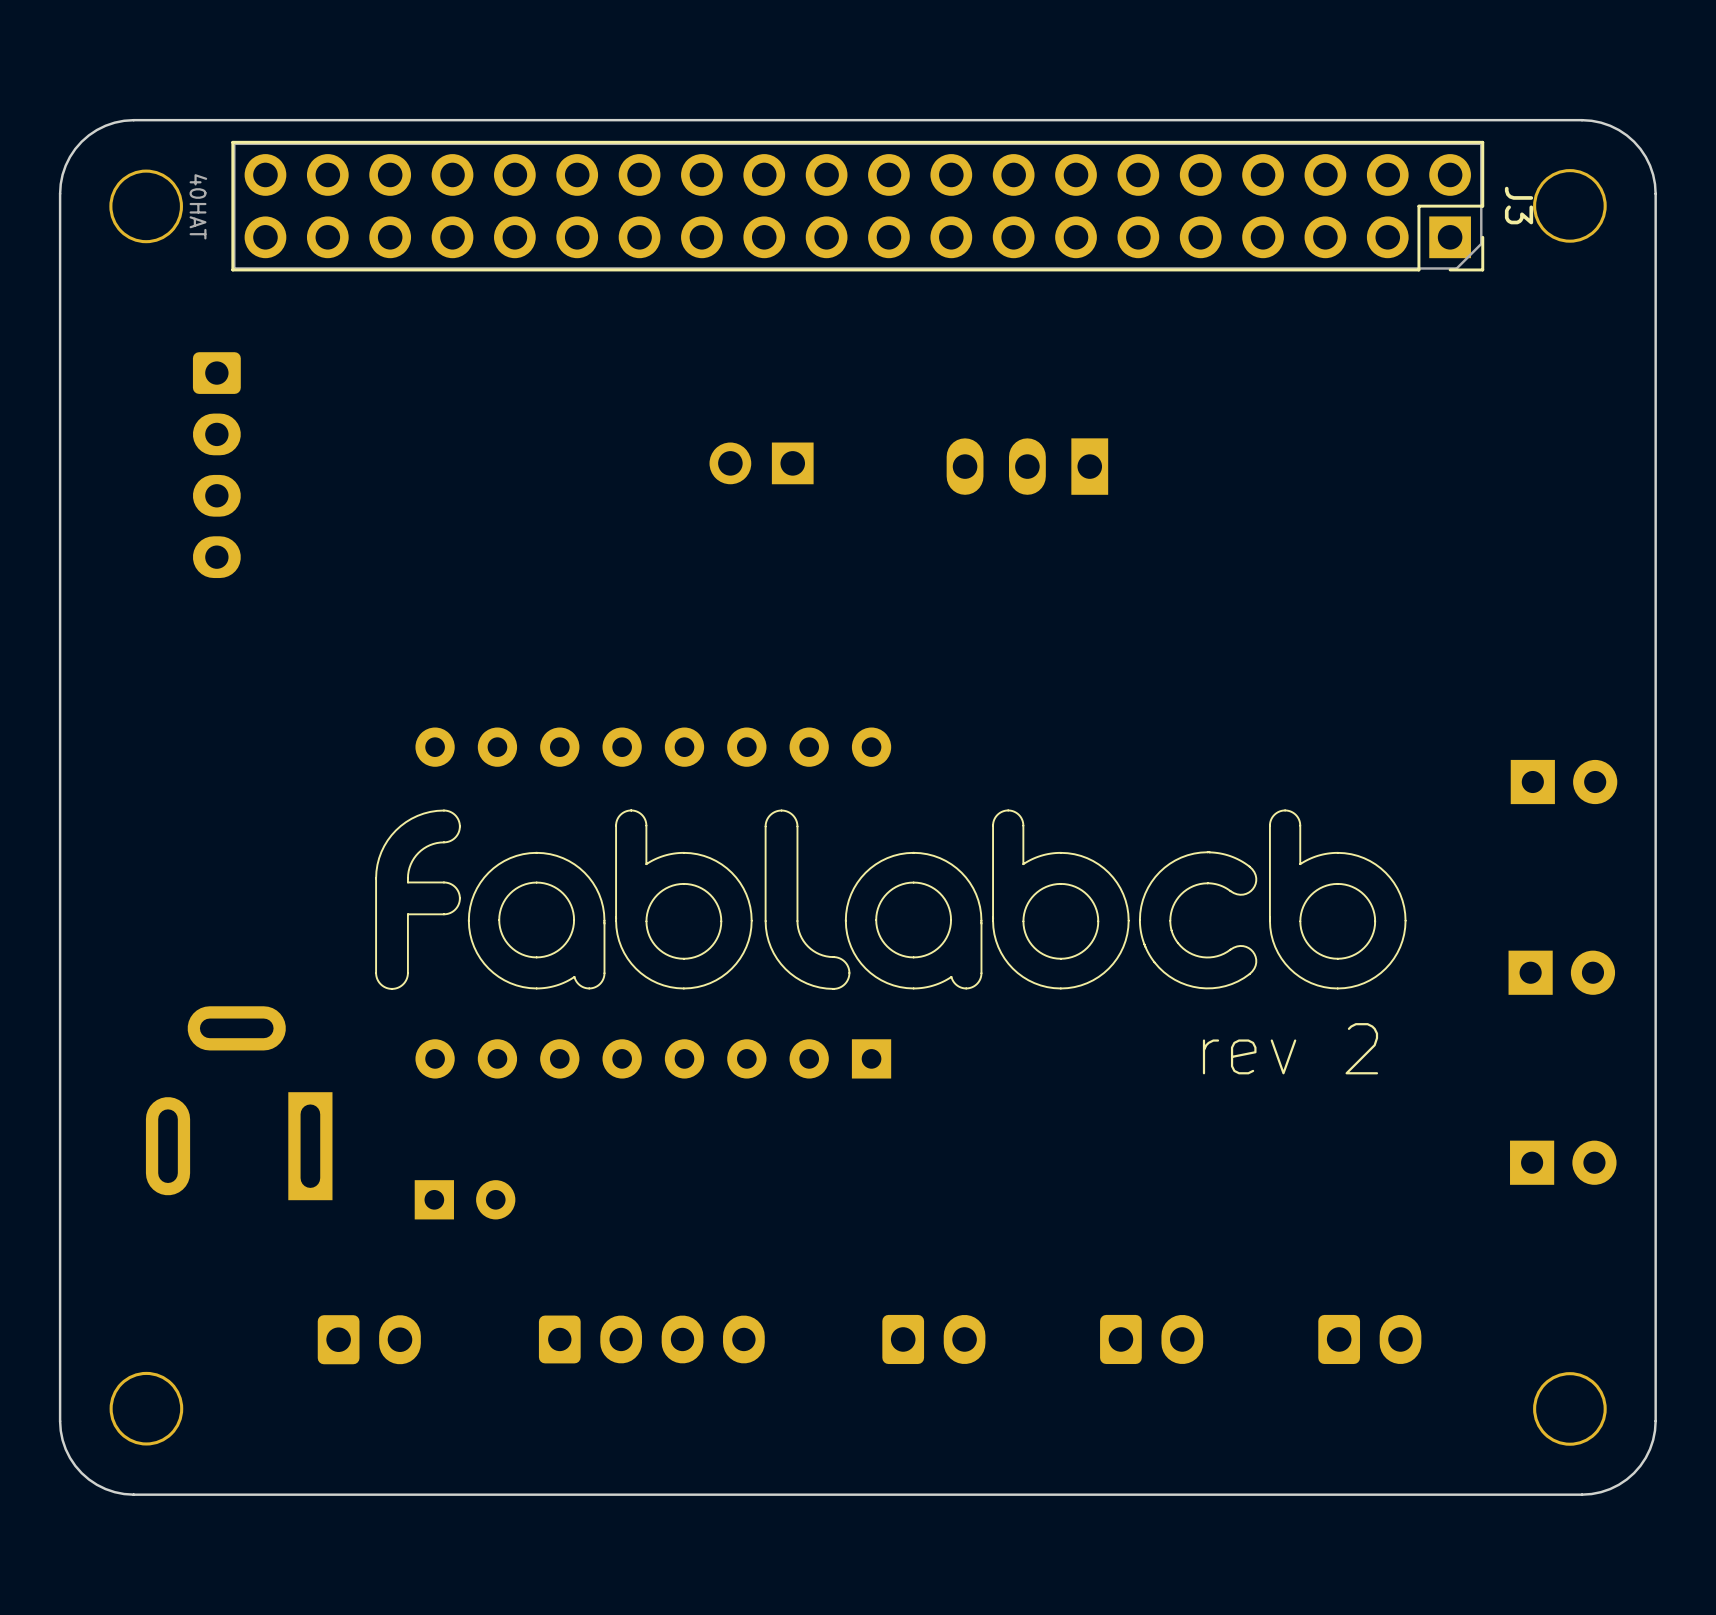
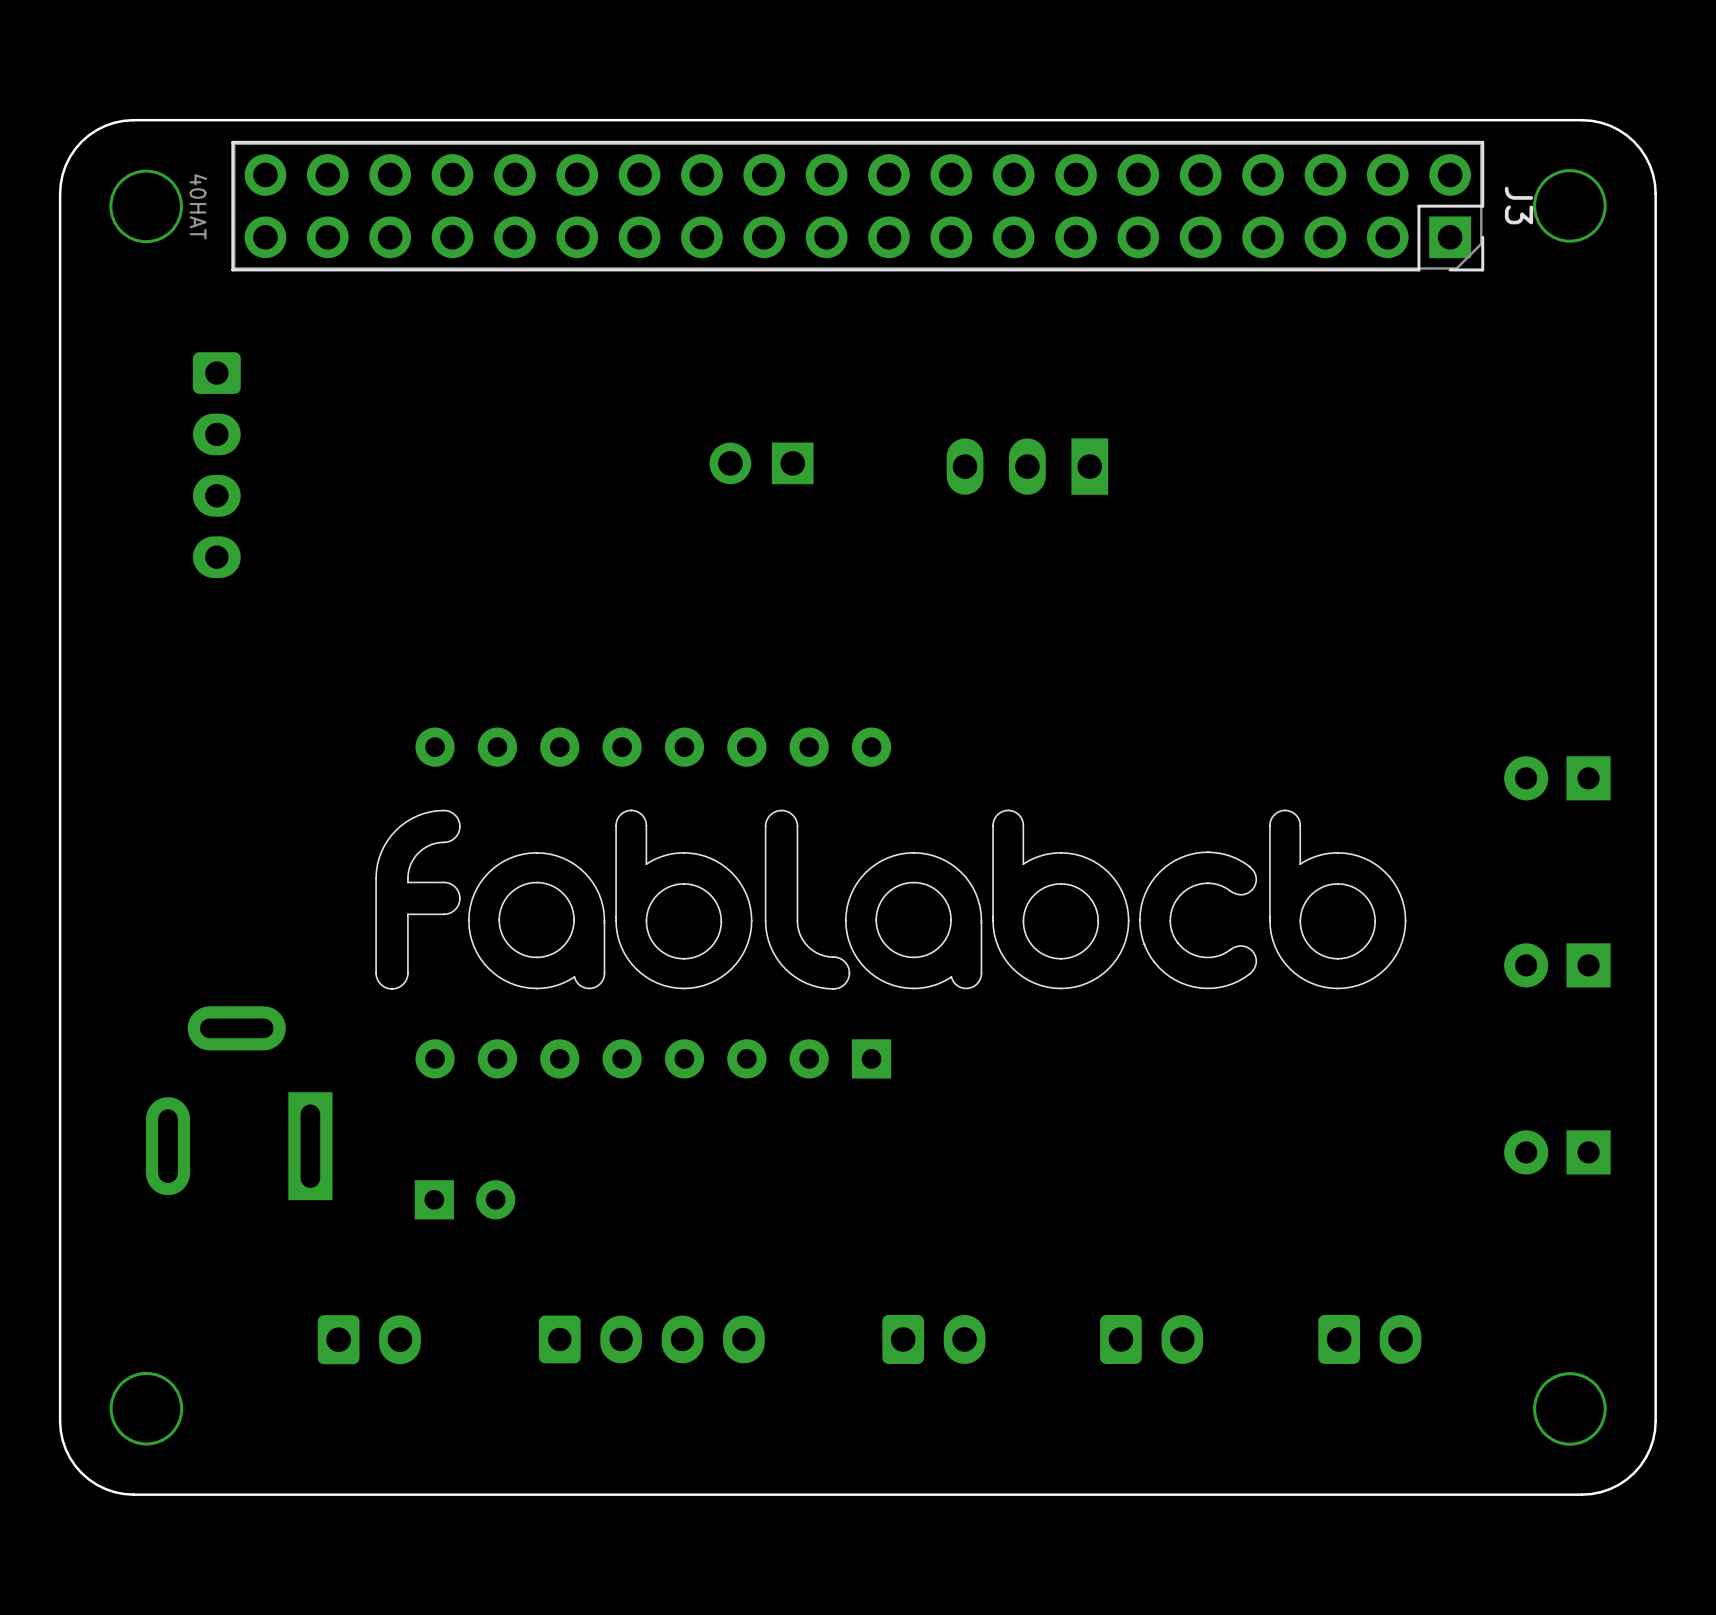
part rotation: 0° (1564, 782) -> 180° (1557, 778)
part rotation: 0° (1561, 972) -> 180° (1557, 965)
text: rev 2 (1290, 1048) -> none
part rotation: 0° (1563, 1162) -> 180° (1557, 1152)

